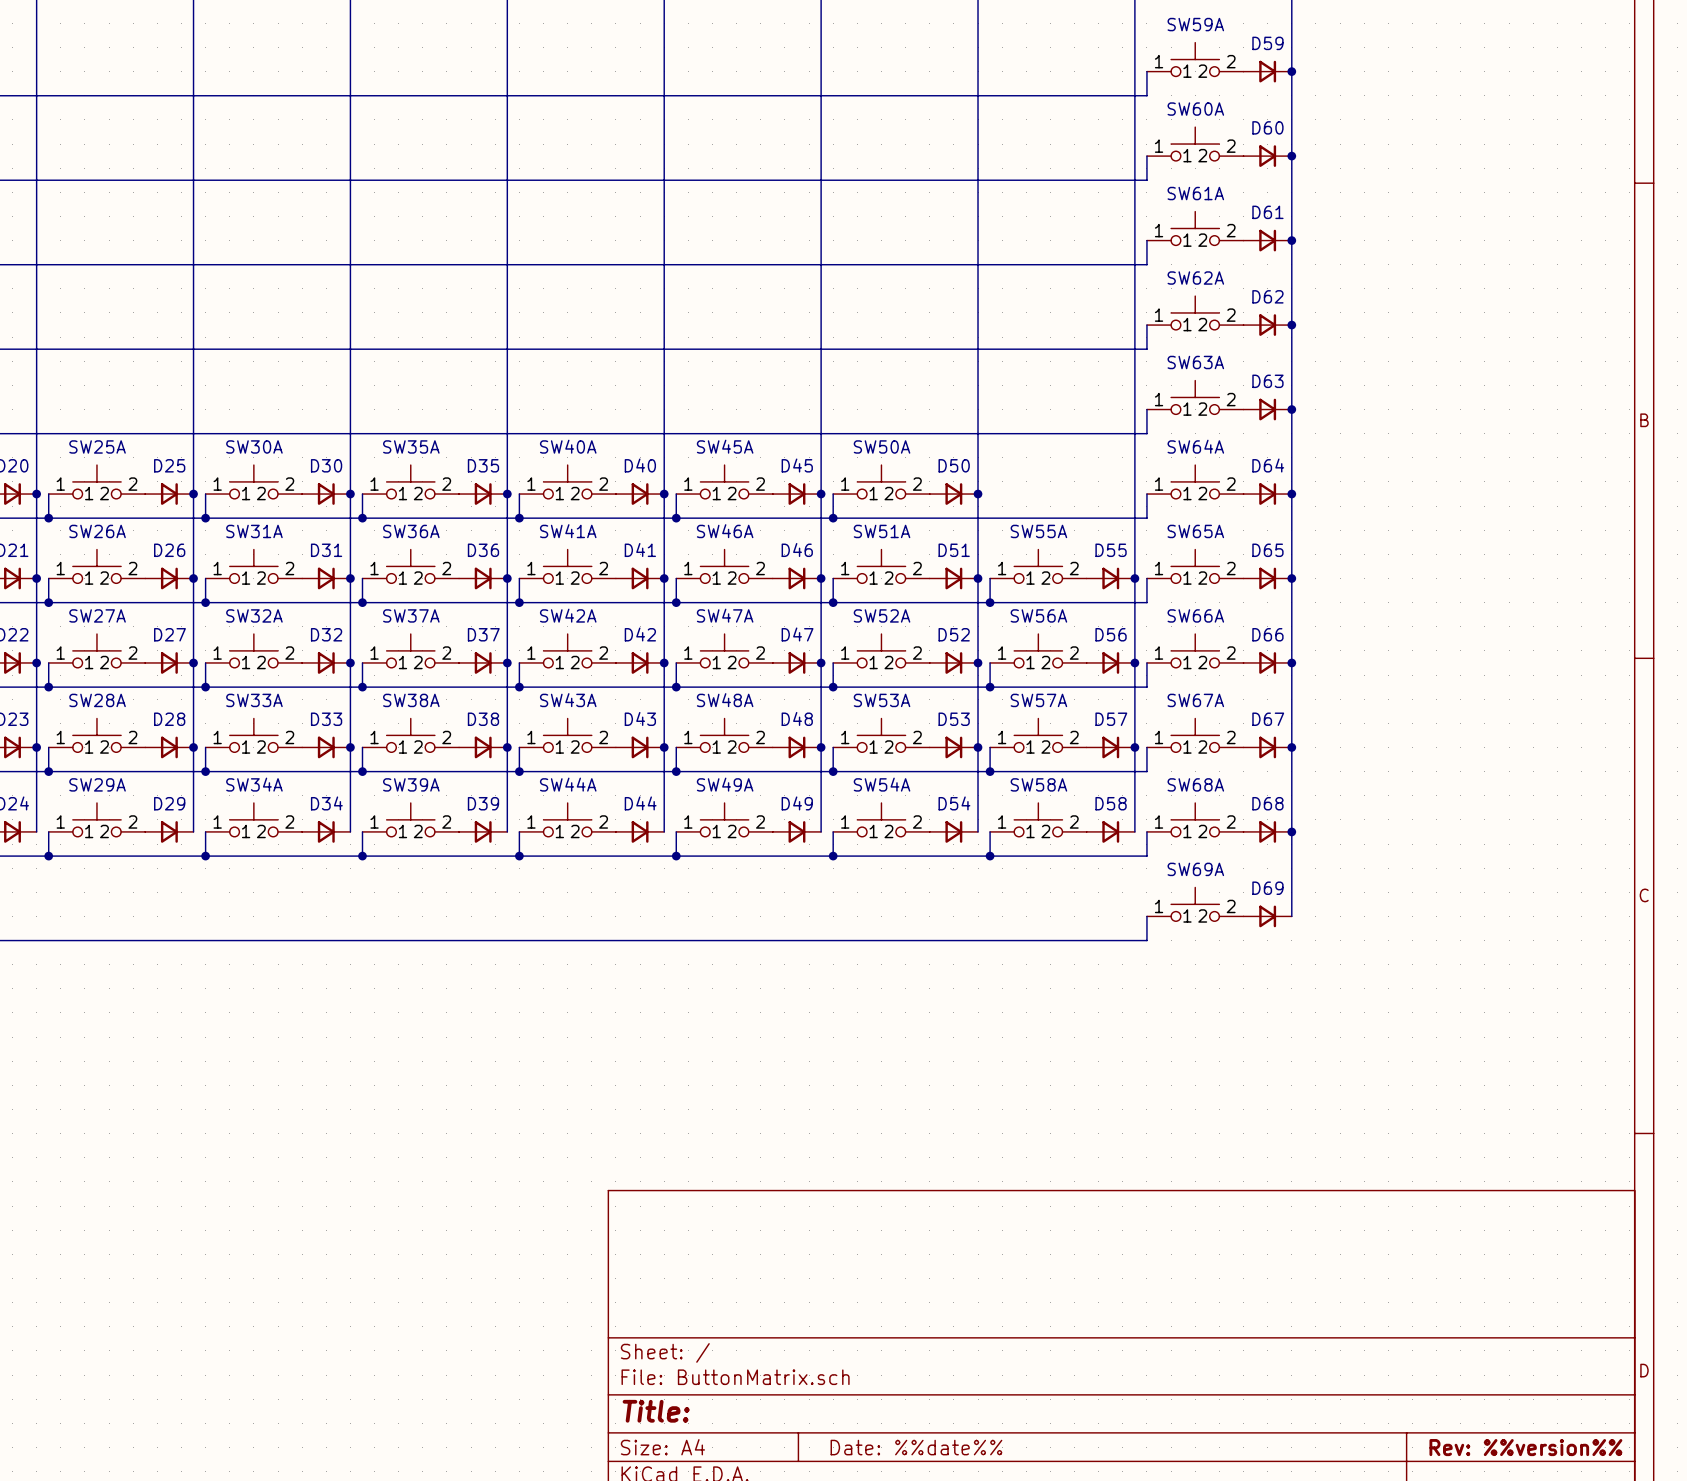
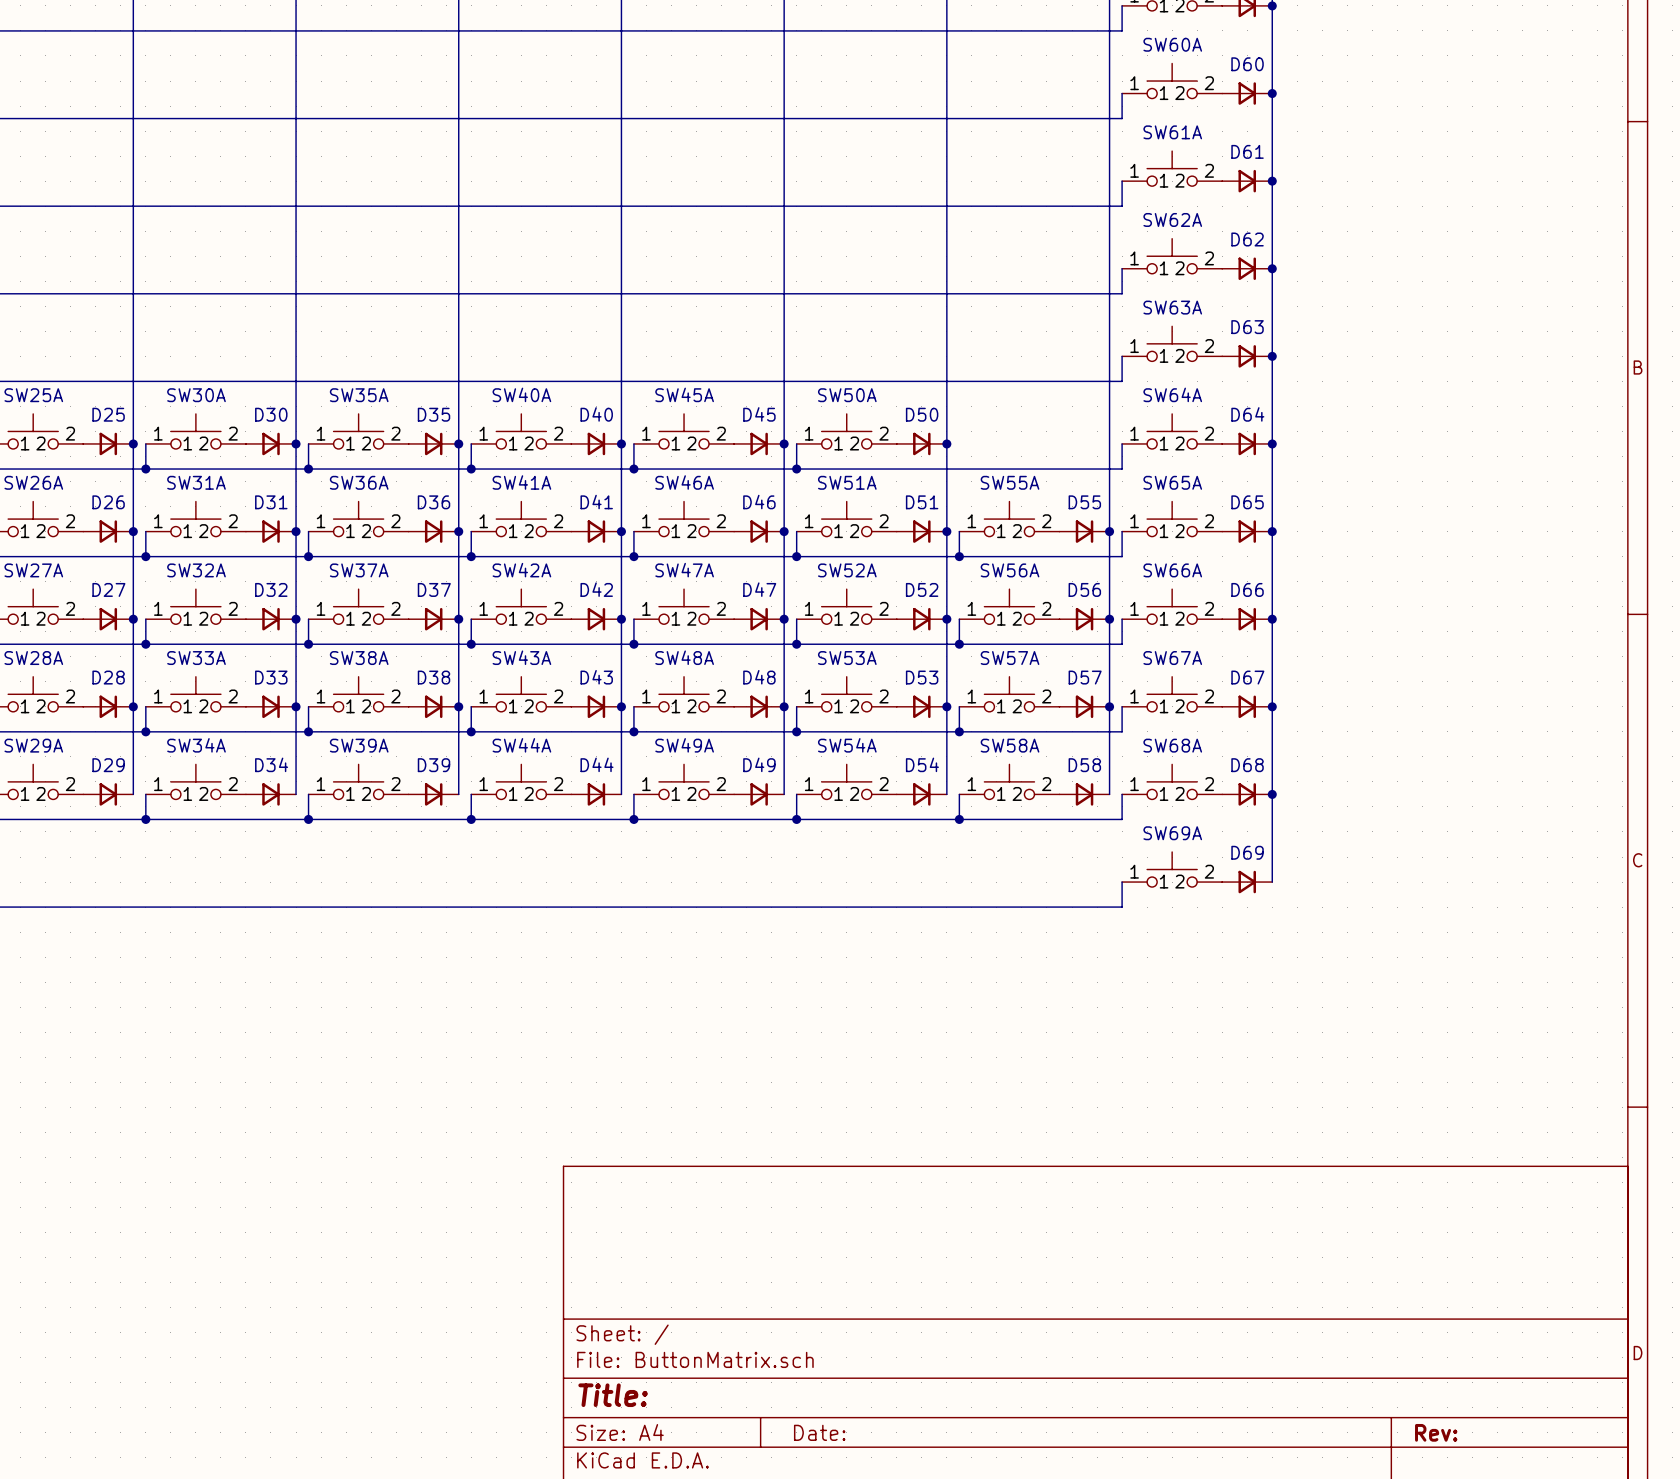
title block: Date: %%date%% (916, 1447) -> Date: (819, 1432)
title block: Rev: %%version%% (1525, 1447) -> Rev: (1436, 1432)

